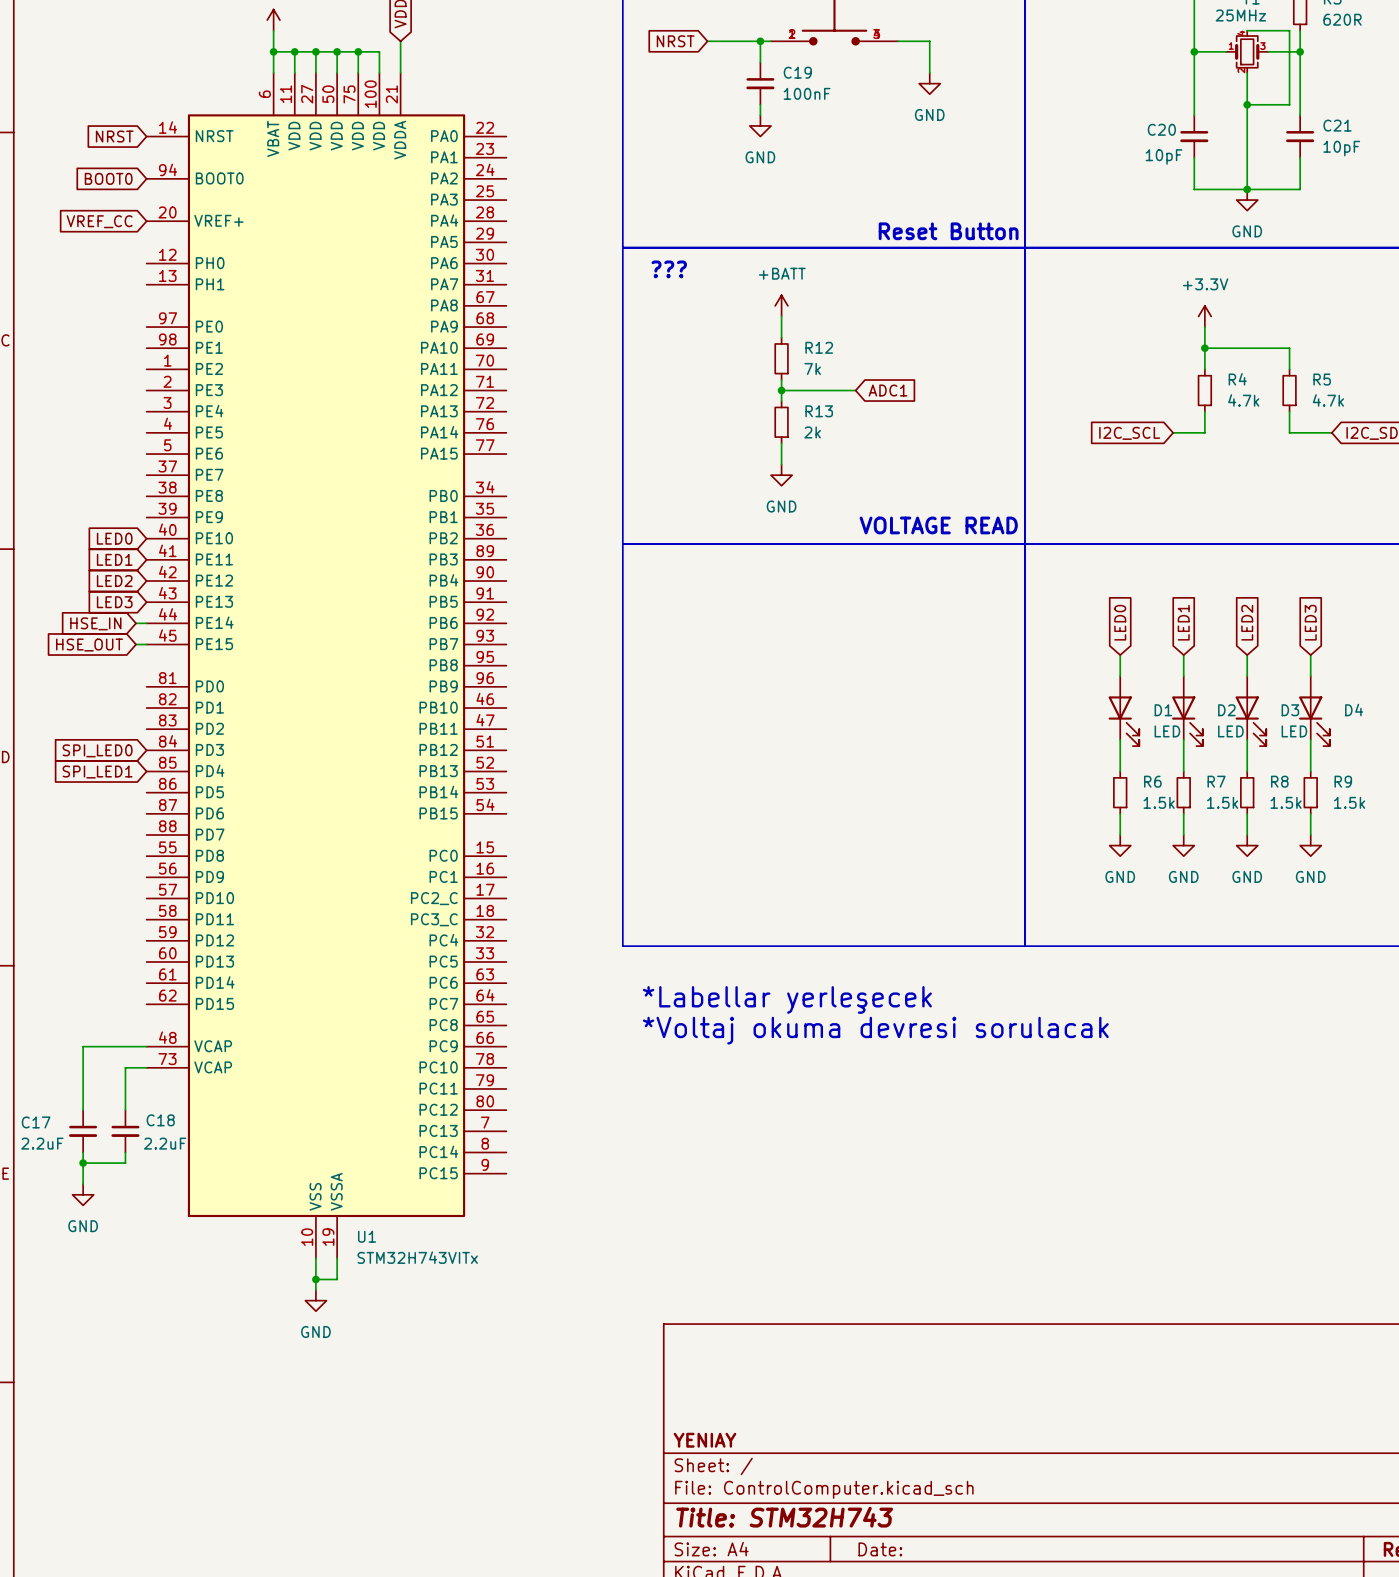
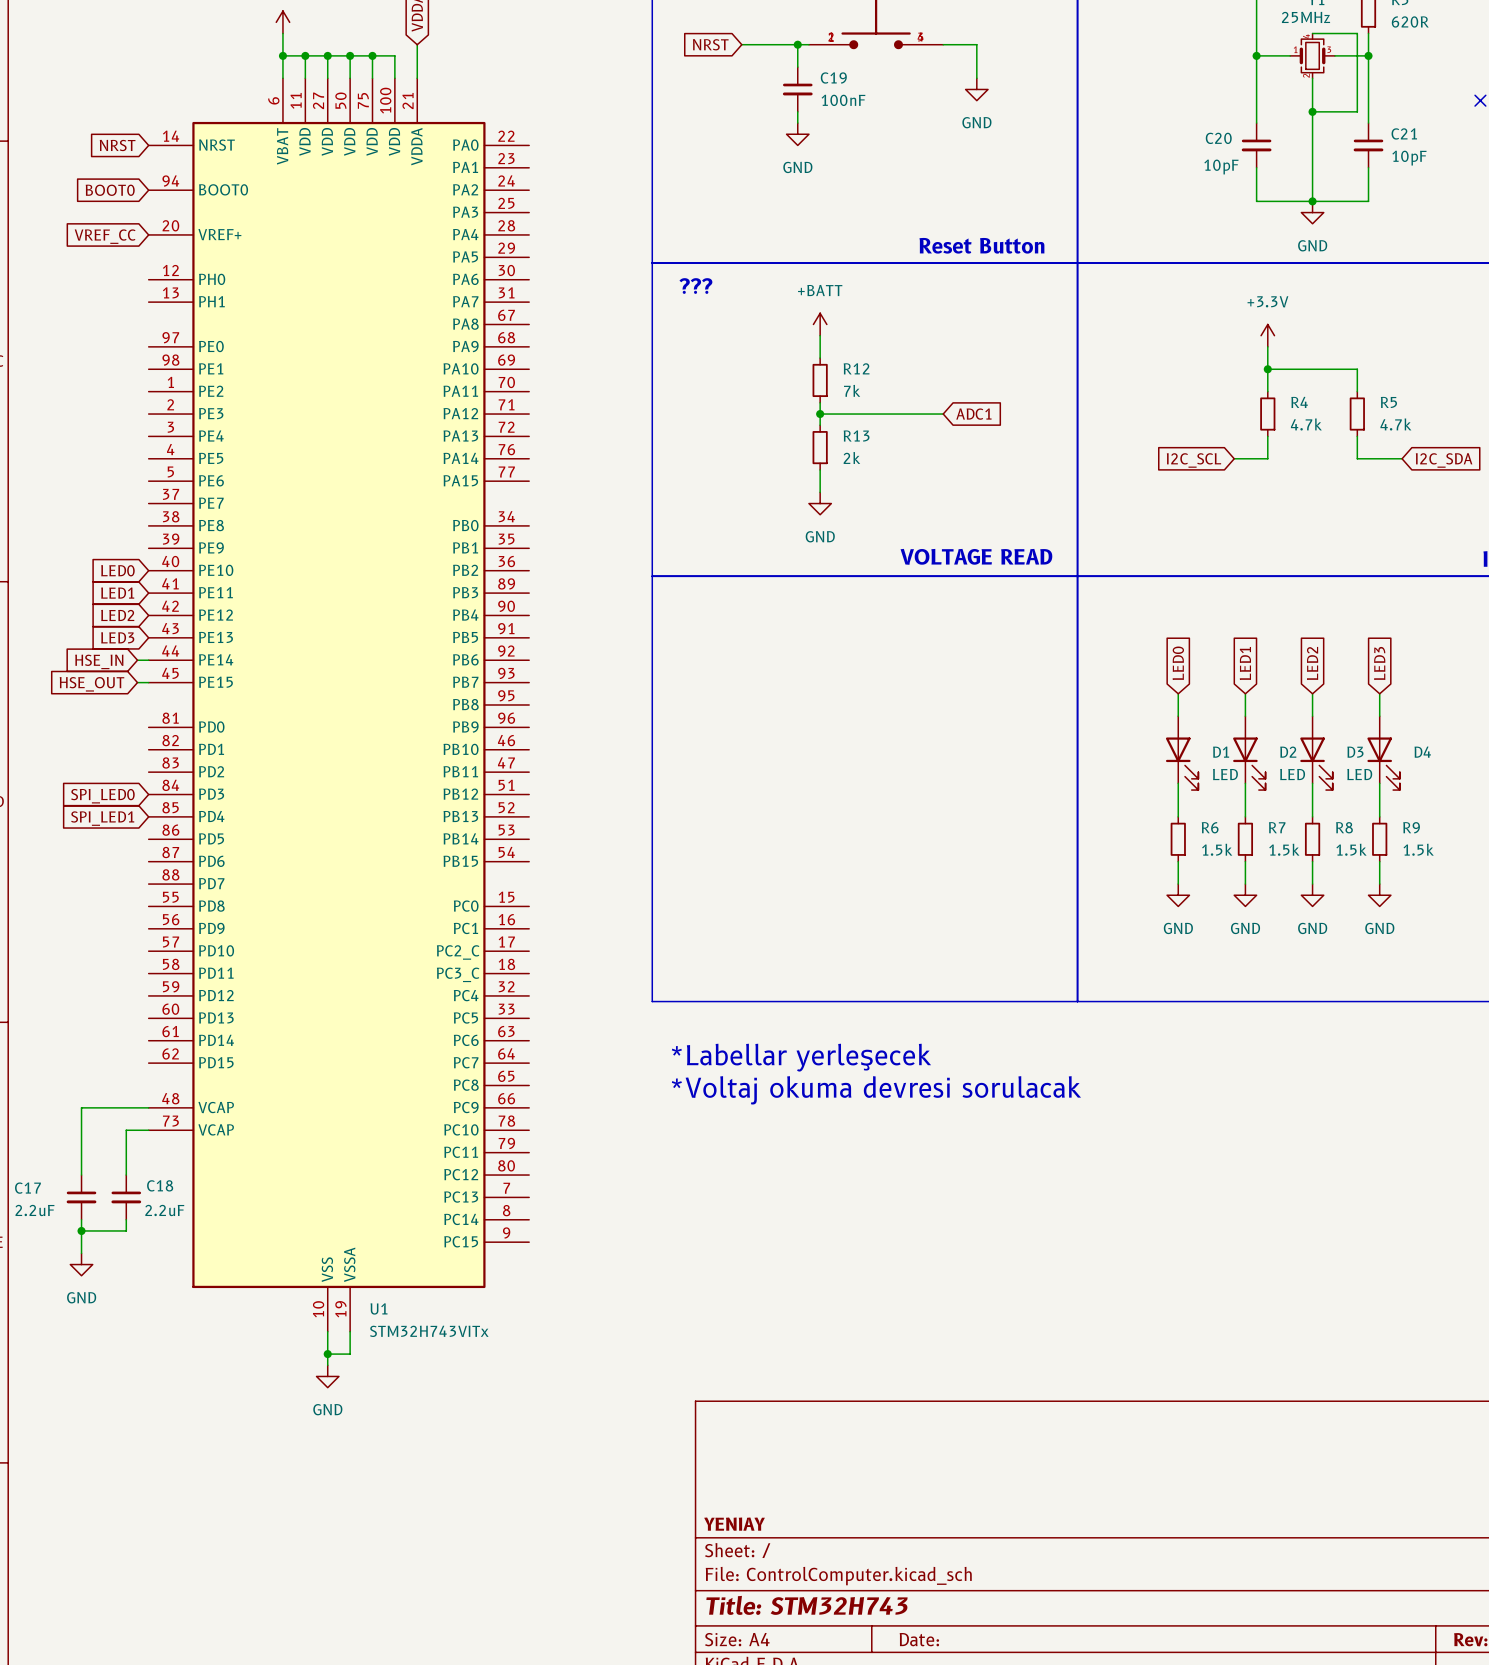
wire: none -> (898, 414) (943, 414)
global label position: ADC1 (888, 390) -> ADC1 (973, 414)

